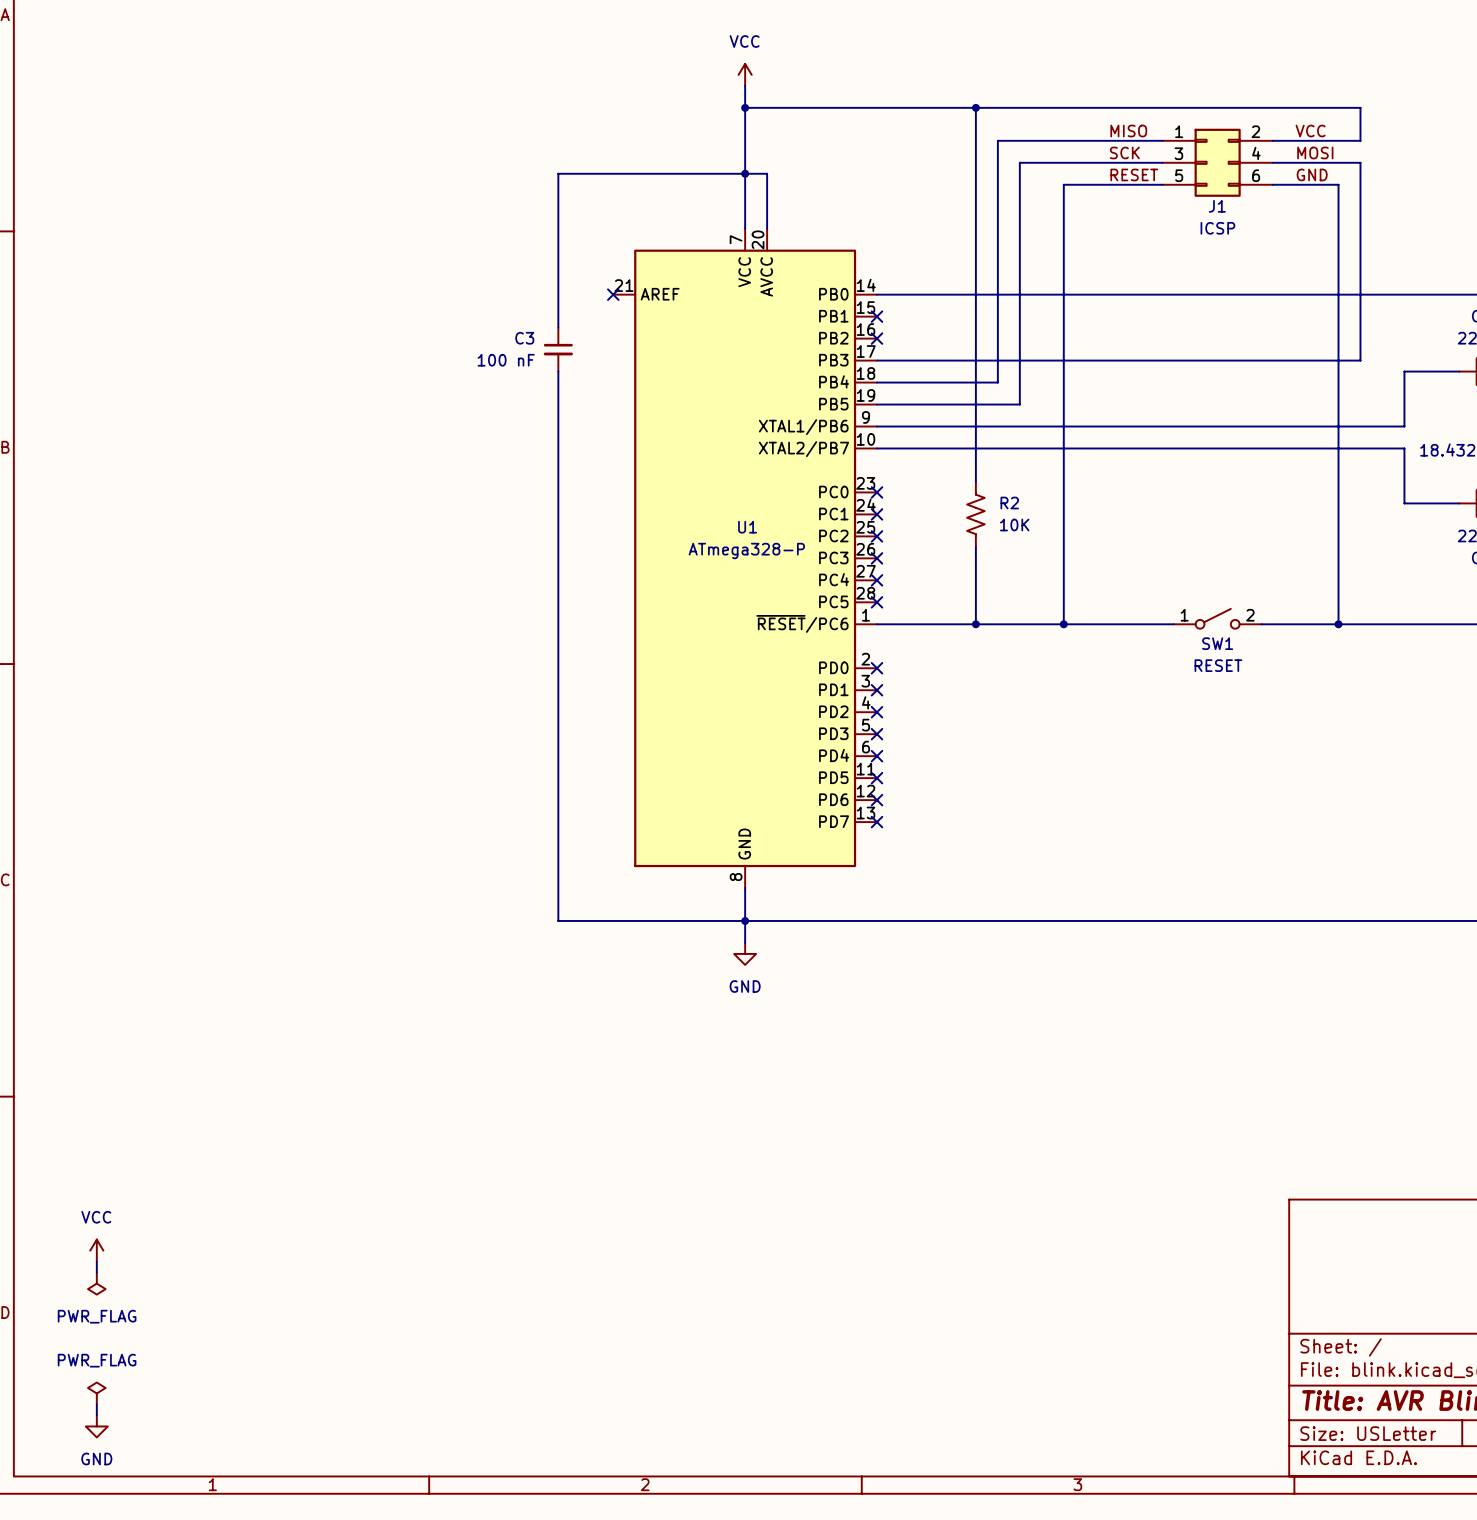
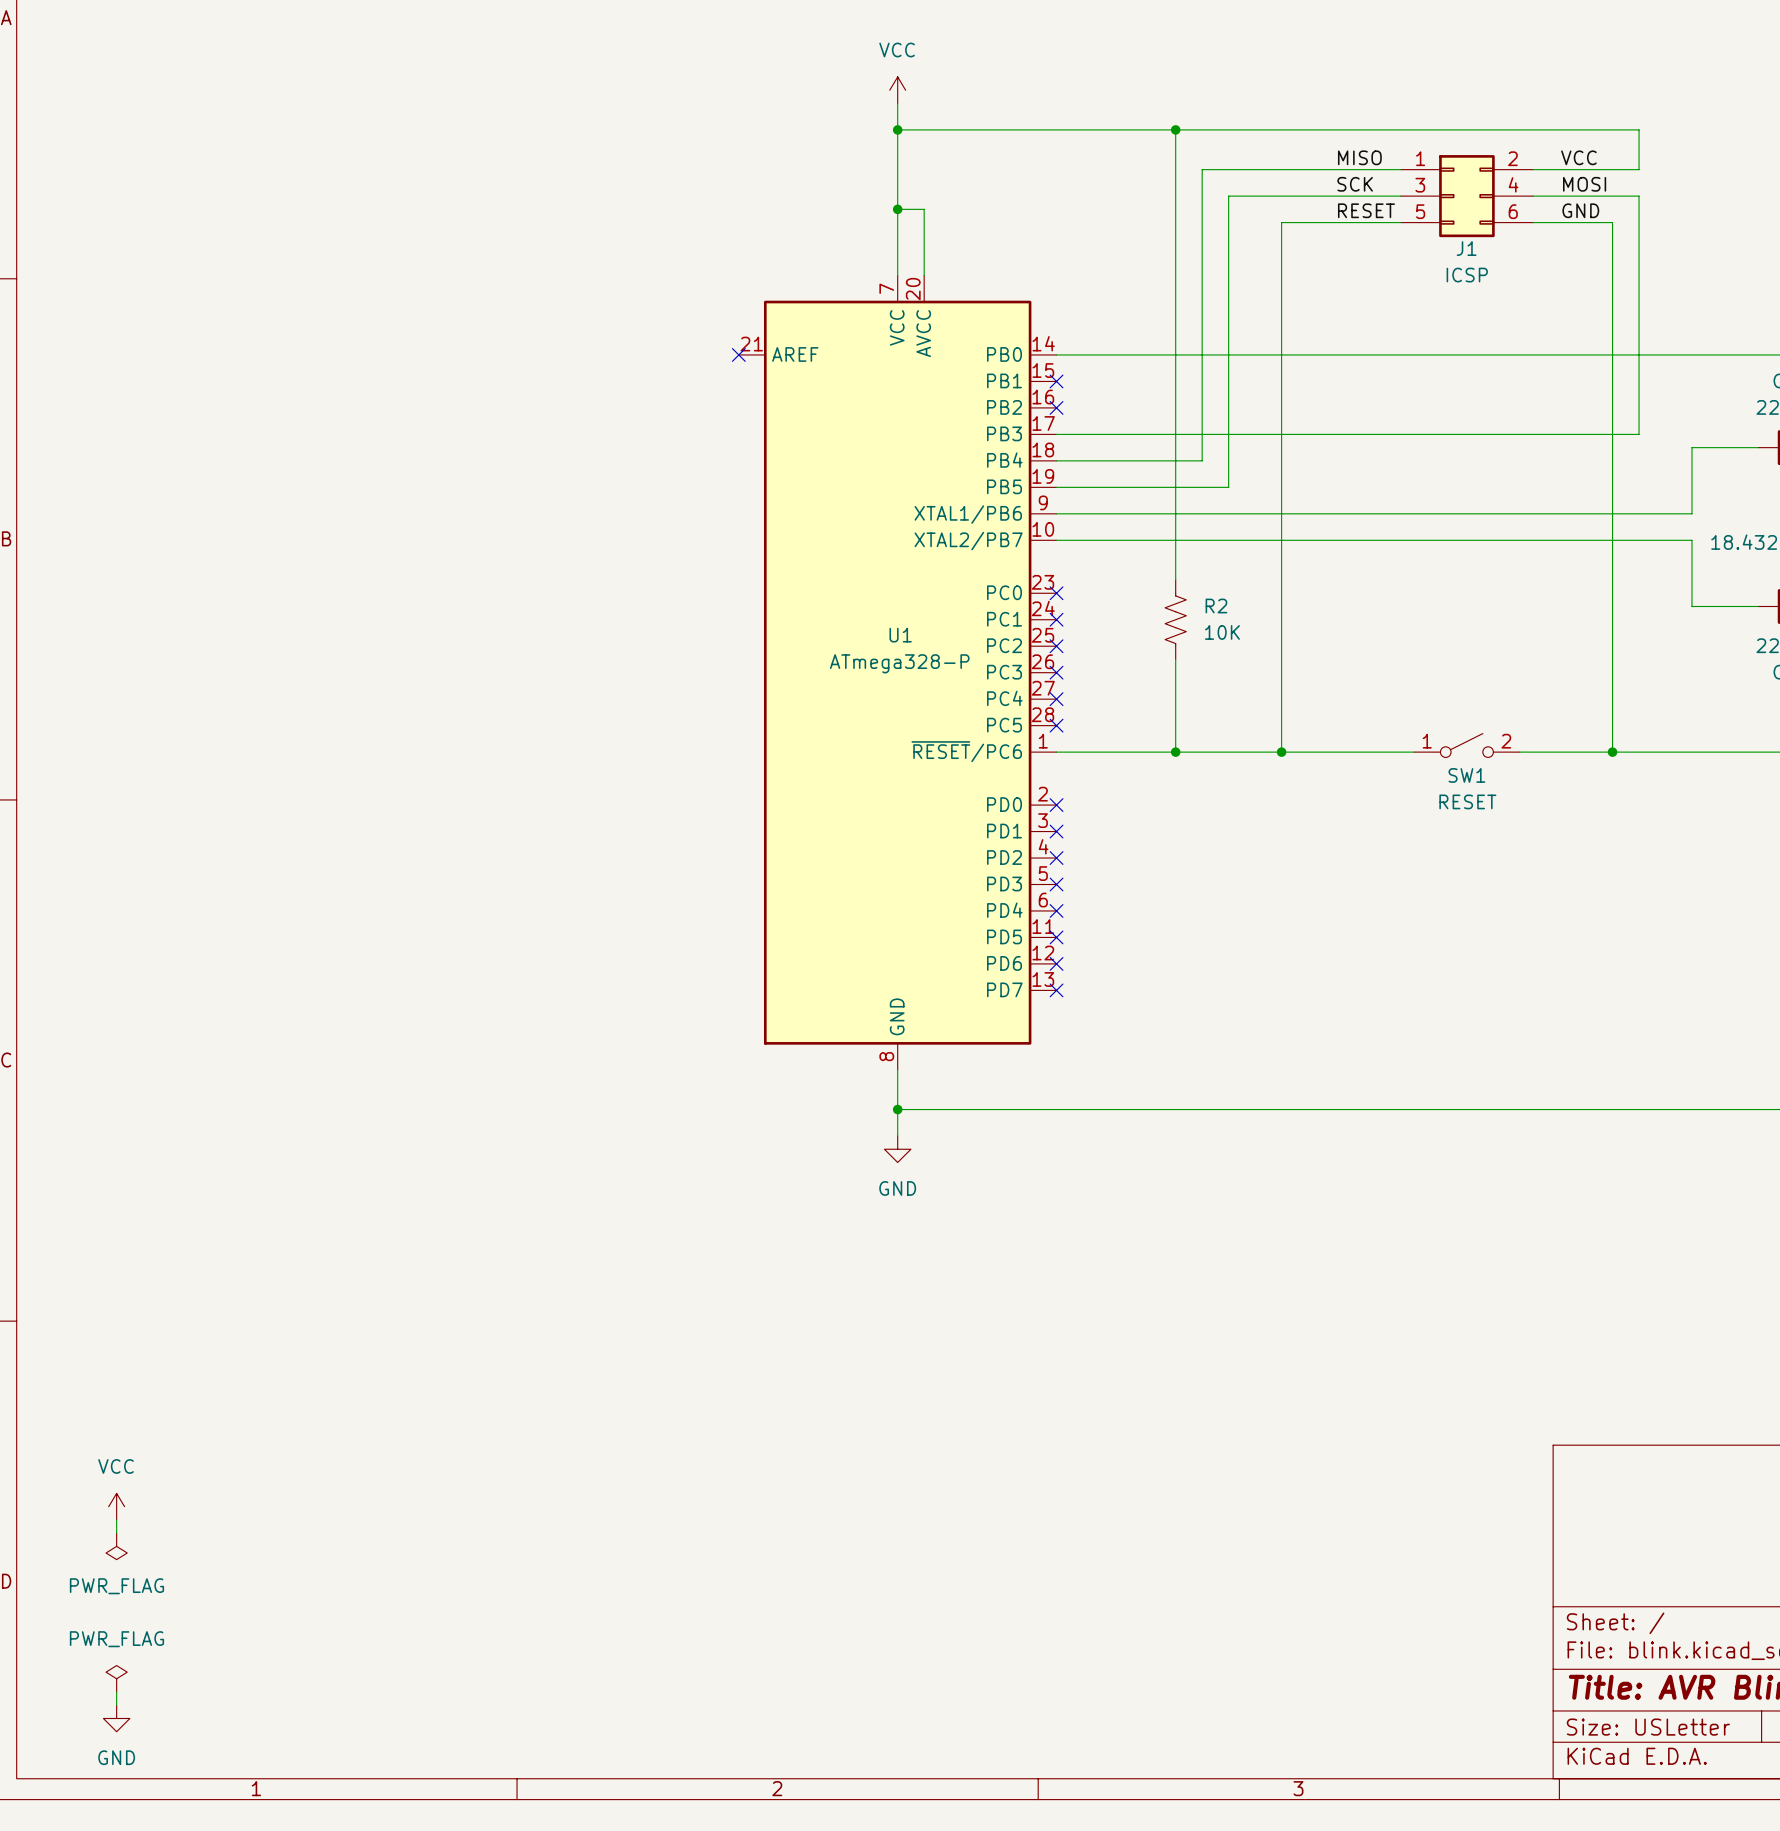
wire: (745, 173) (558, 173) (558, 327) -> none
C3: 100 nF (558, 349) -> none
wire: (558, 371) (558, 920) (745, 920) -> none

